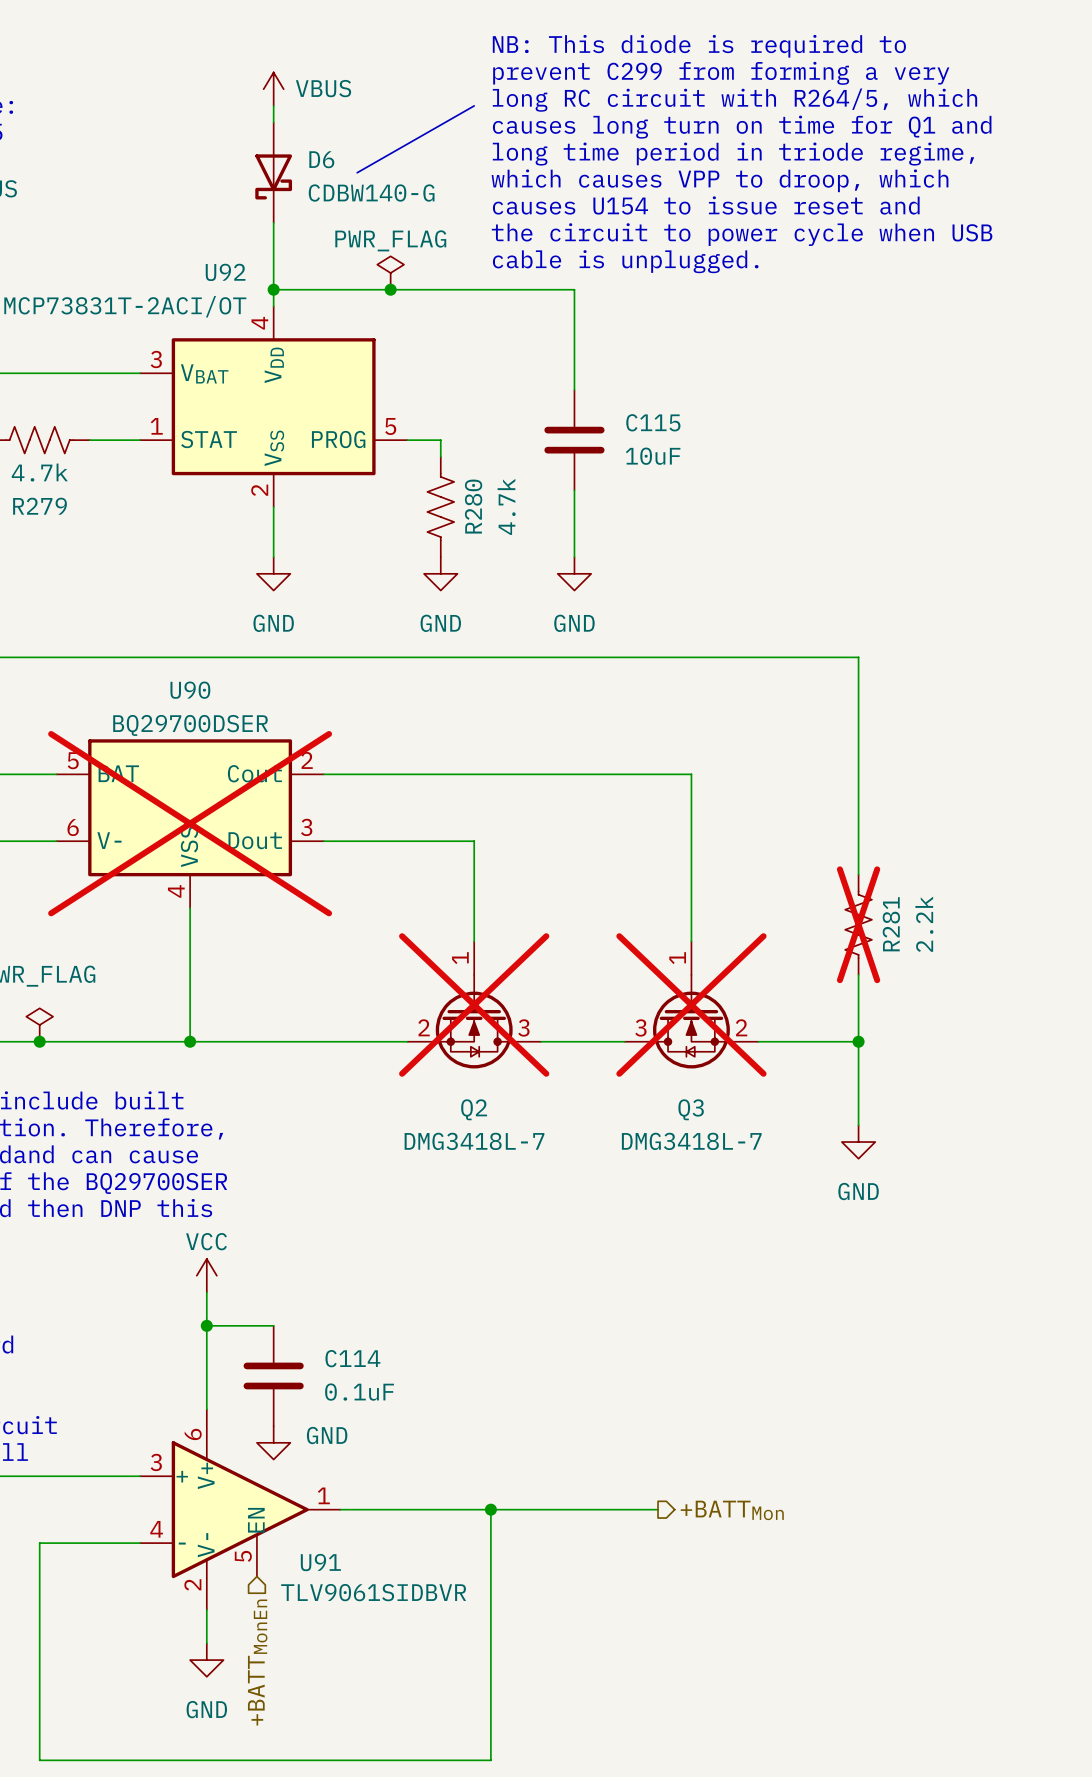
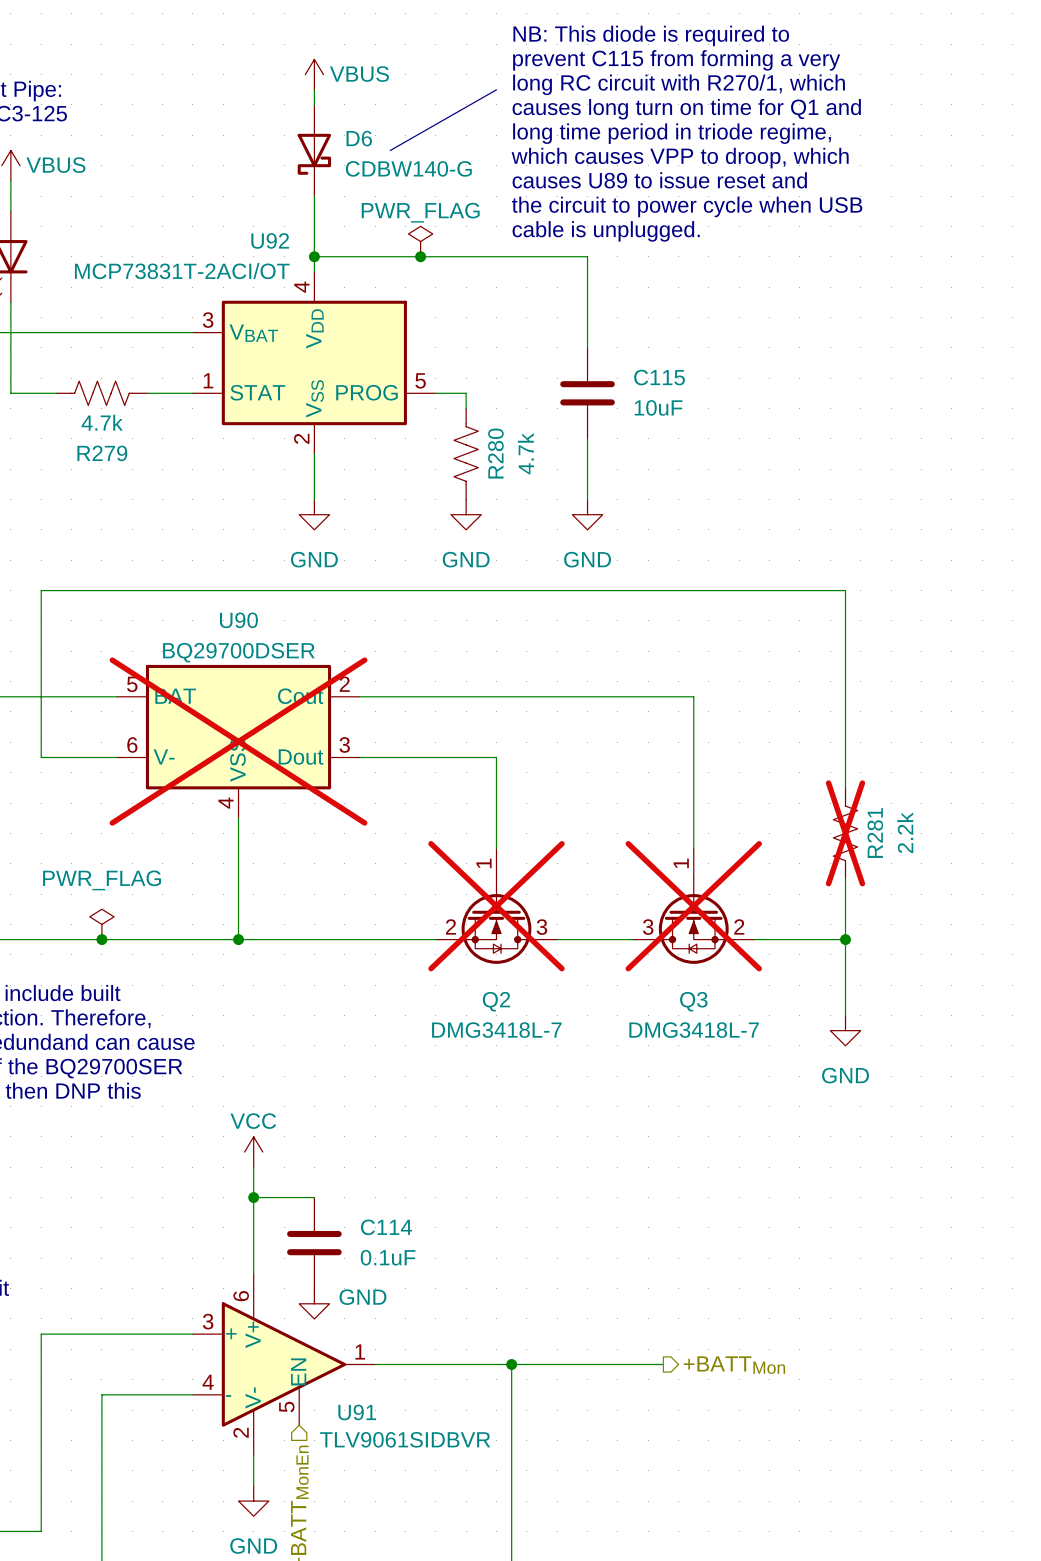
text: prevent C299 from forming a very (721, 73) -> prevent C115 from forming a very (676, 60)
text: long RC circuit with R264/5, which (734, 100) -> long RC circuit with R270/1, which (679, 84)
text: causes U154 to issue reset and (706, 205) -> causes U89 to issue reset and (659, 180)

